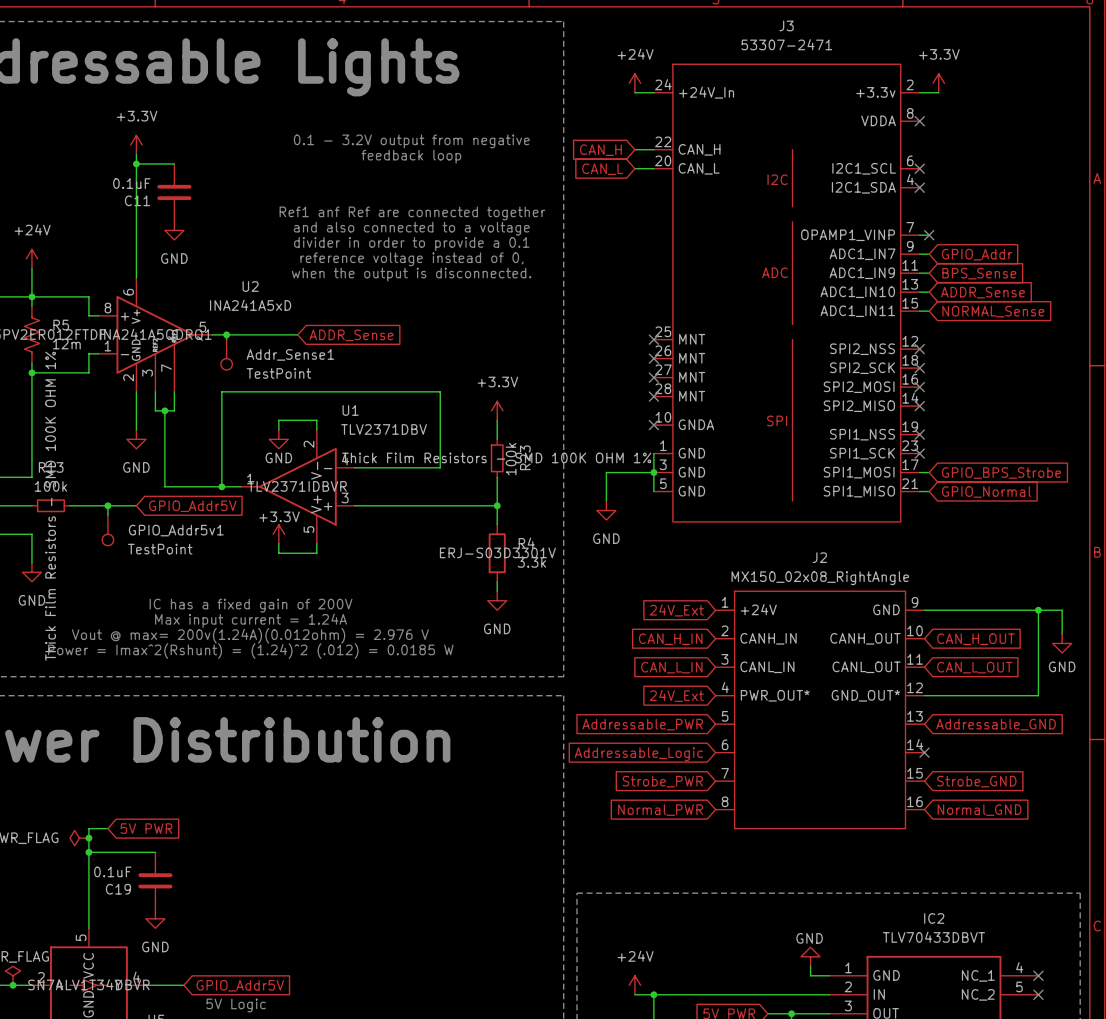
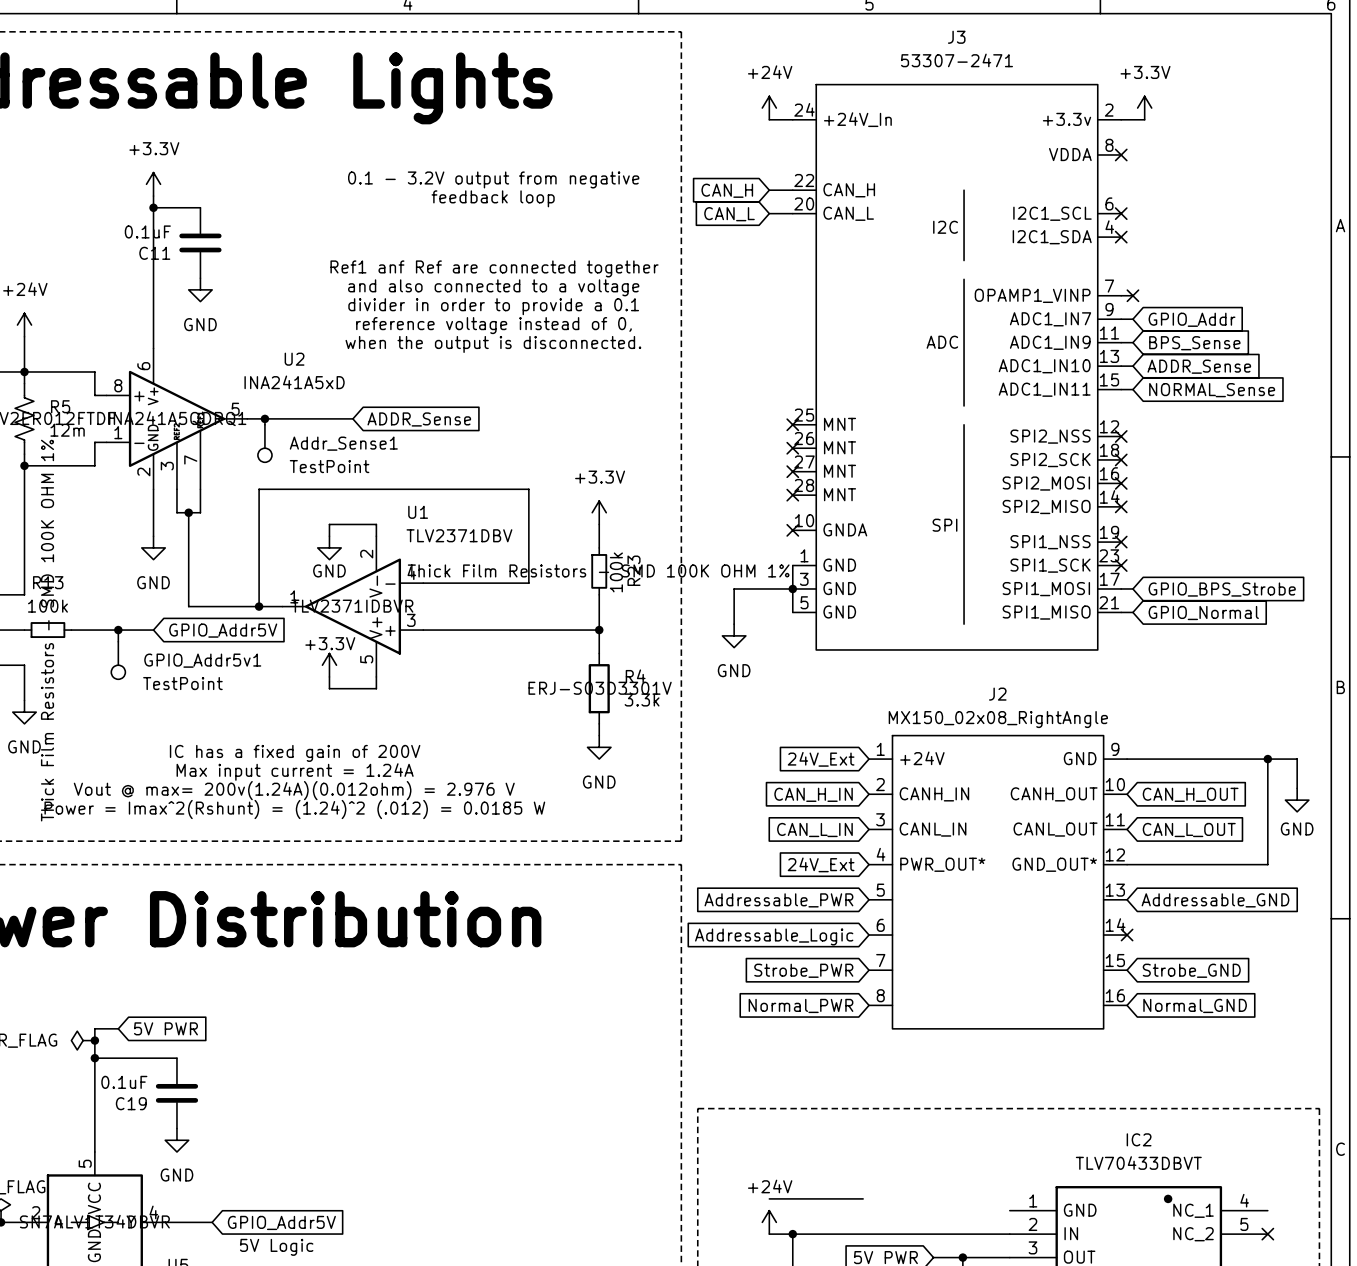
power symbol: GND (810, 956) -> none
wire: none -> (769, 1198) (863, 1198)
wire: (810, 966) (810, 975) (829, 975) -> none
junction: none -> (1168, 1198)
no-connect mark: (1038, 975) -> none

